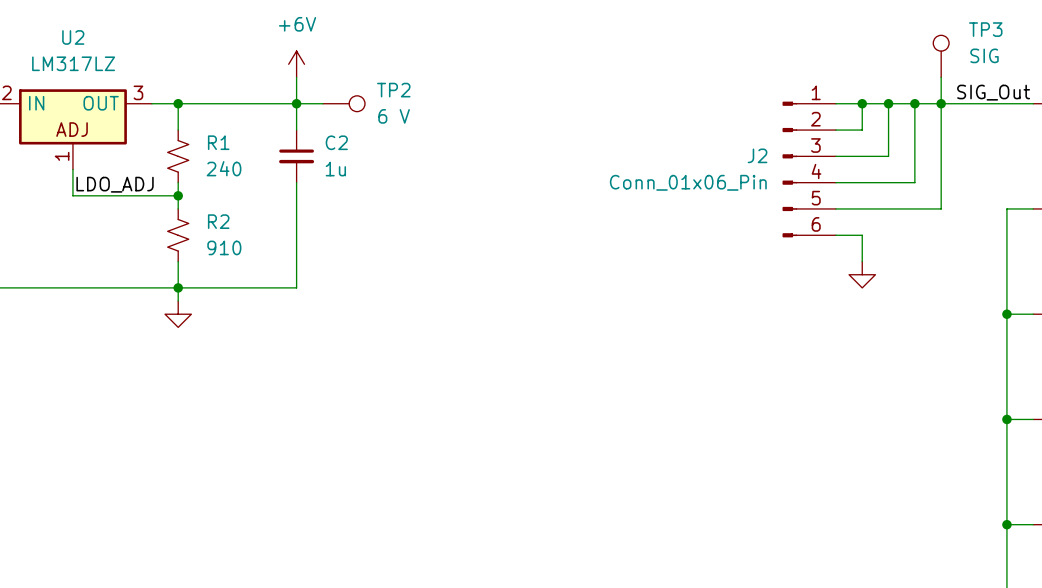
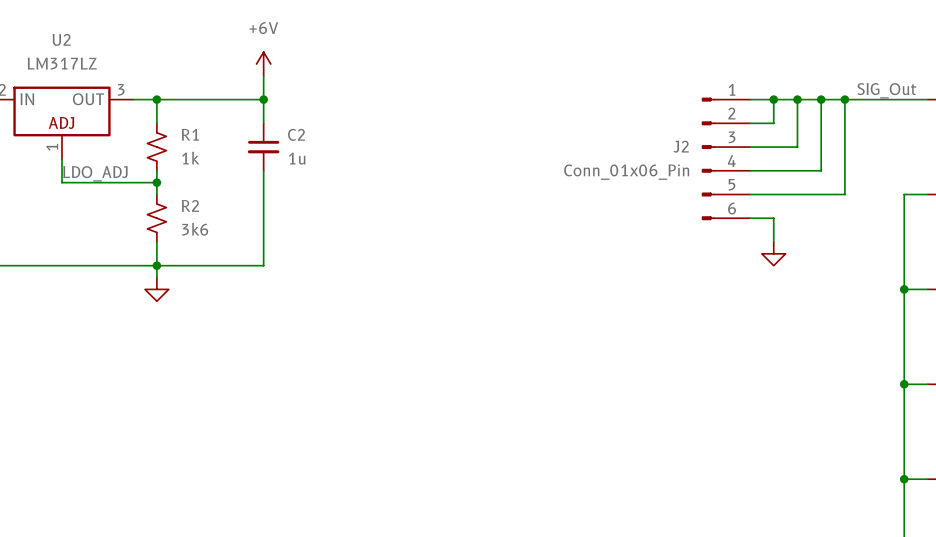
TP3: SIG (941, 56) -> none
wire: (941, 77) (941, 103) -> none
wire: (296, 103) (322, 103) -> none
TP2: 6 V (343, 103) -> none
R1 value: 240 (224, 168) -> 1k (190, 158)
R2 value: 910 (224, 247) -> 3k6 (195, 229)

